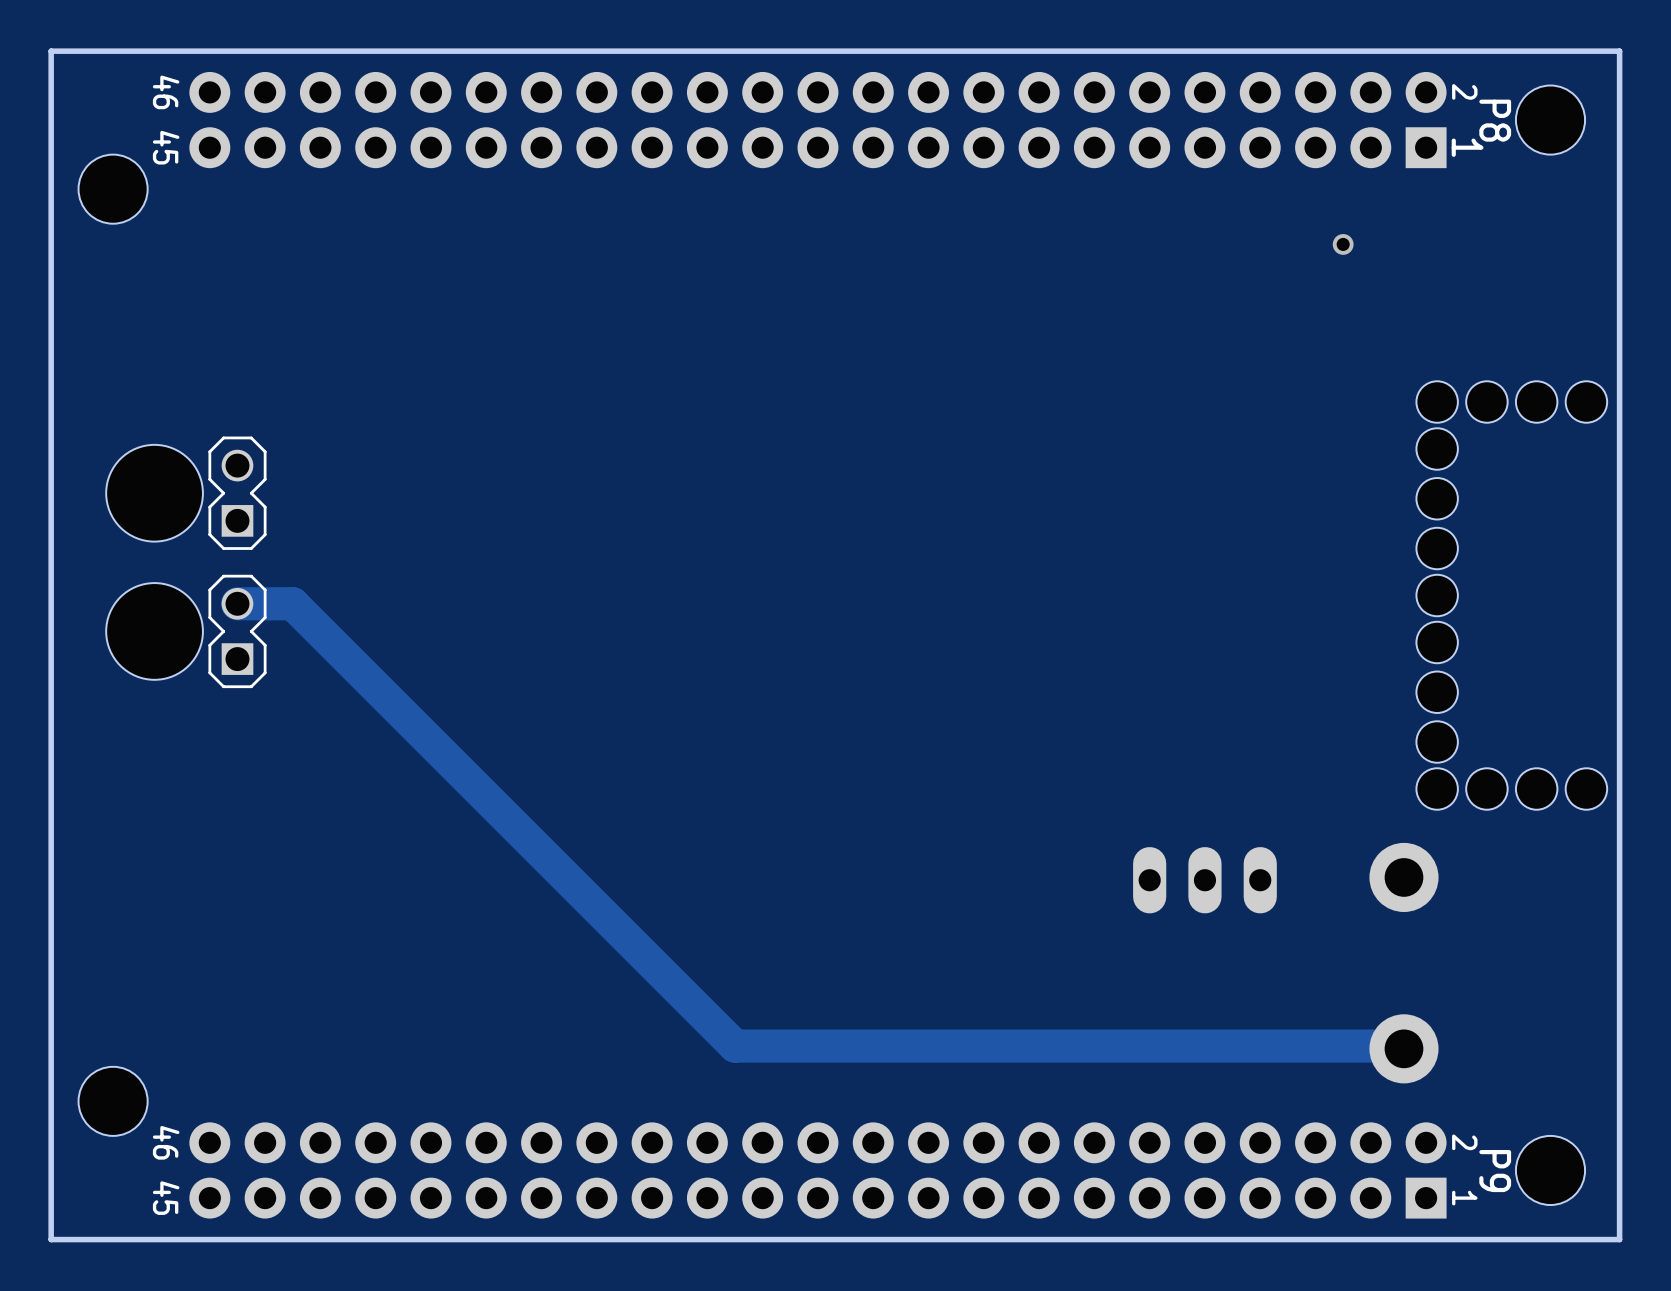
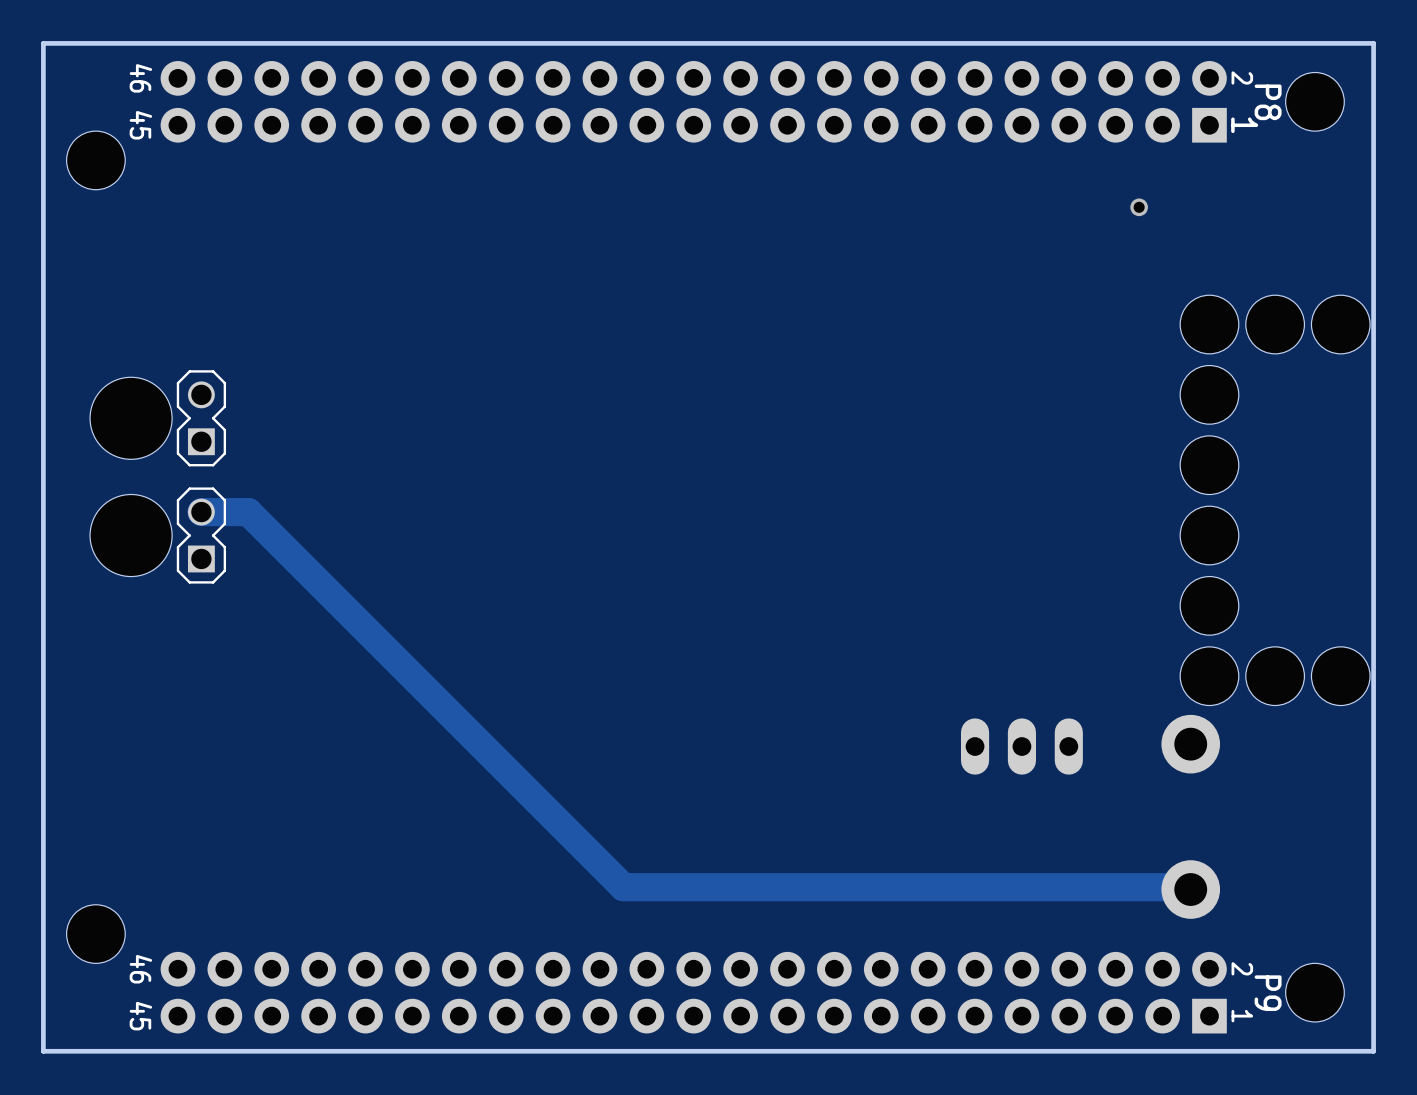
hole size: [1565, 381, 1608, 423] -> [1311, 295, 1371, 354]
hole: none -> (1209, 324)
hole: none -> (1275, 324)
hole: (1437, 402) -> none
hole: (1486, 402) -> none
hole: (1536, 402) -> none
hole: (1437, 449) -> none
hole: none -> (1209, 394)
hole: (1437, 498) -> none
hole size: [1416, 527, 1458, 570] -> [1180, 435, 1239, 495]
hole: (1437, 595) -> none
hole size: [1416, 621, 1458, 664] -> [1180, 506, 1239, 565]
hole: (1437, 692) -> none
hole: none -> (1209, 605)
hole: (1437, 742) -> none
hole size: [1416, 768, 1458, 810] -> [1180, 646, 1239, 706]
hole size: [1565, 768, 1608, 810] -> [1311, 646, 1371, 706]
hole: (1486, 789) -> none
hole: (1536, 789) -> none
hole: none -> (1275, 676)

